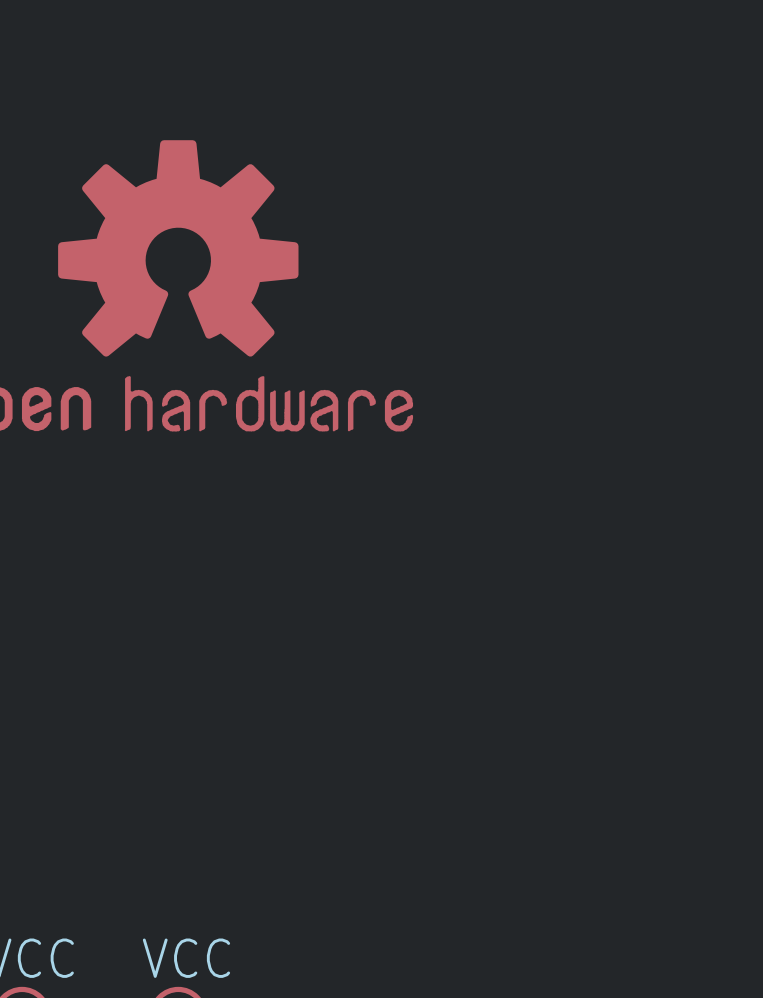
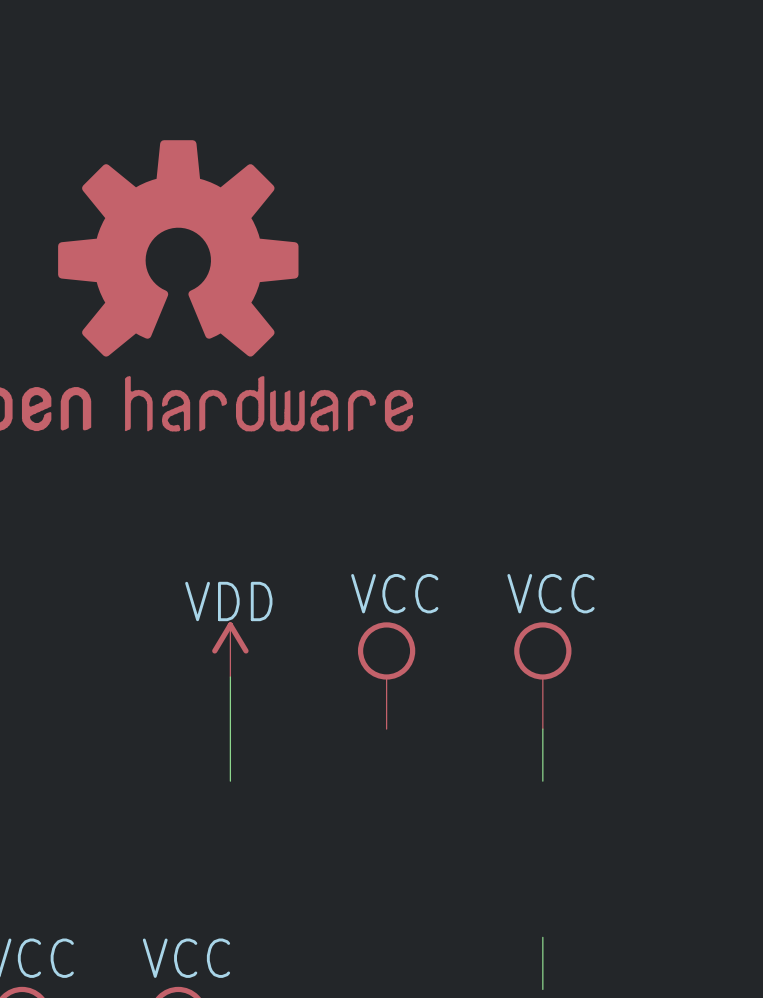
power symbol: none -> VDD (230, 649)
power symbol: none -> VCC (386, 675)
power symbol: none -> VCC (542, 675)
wire: none -> (230, 676) (230, 781)
wire: none -> (542, 729) (542, 781)
wire: none -> (542, 937) (542, 989)

